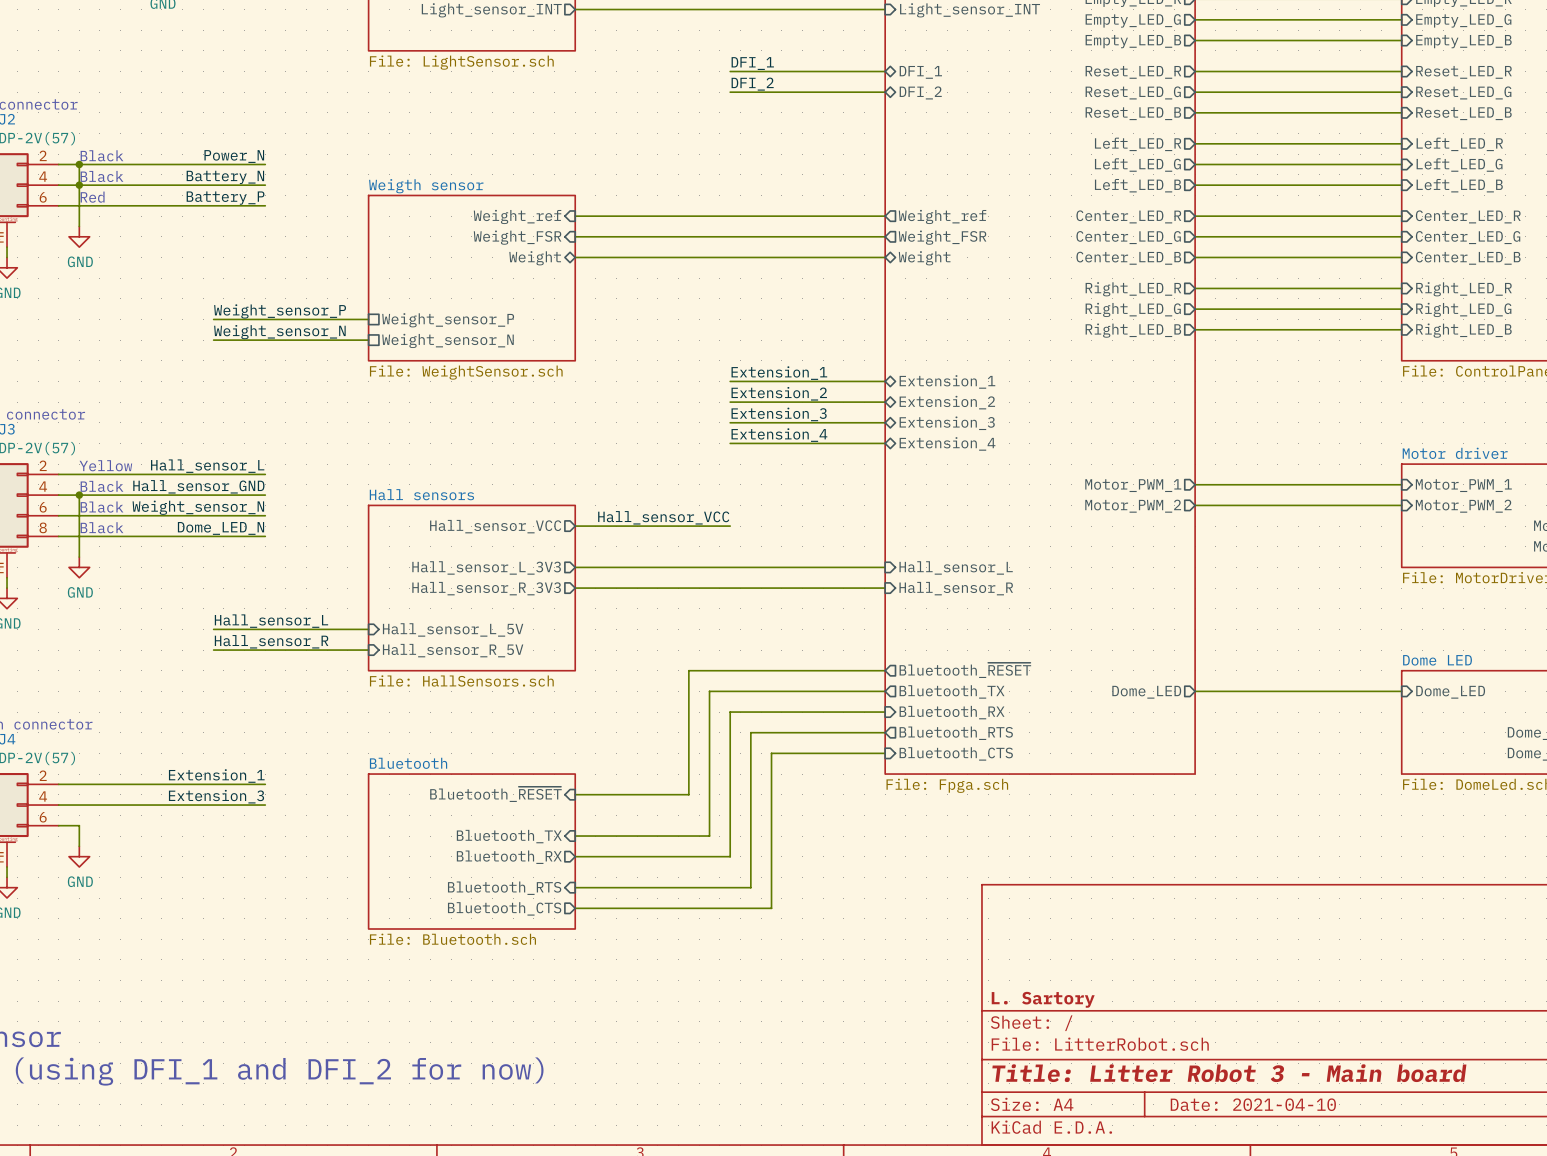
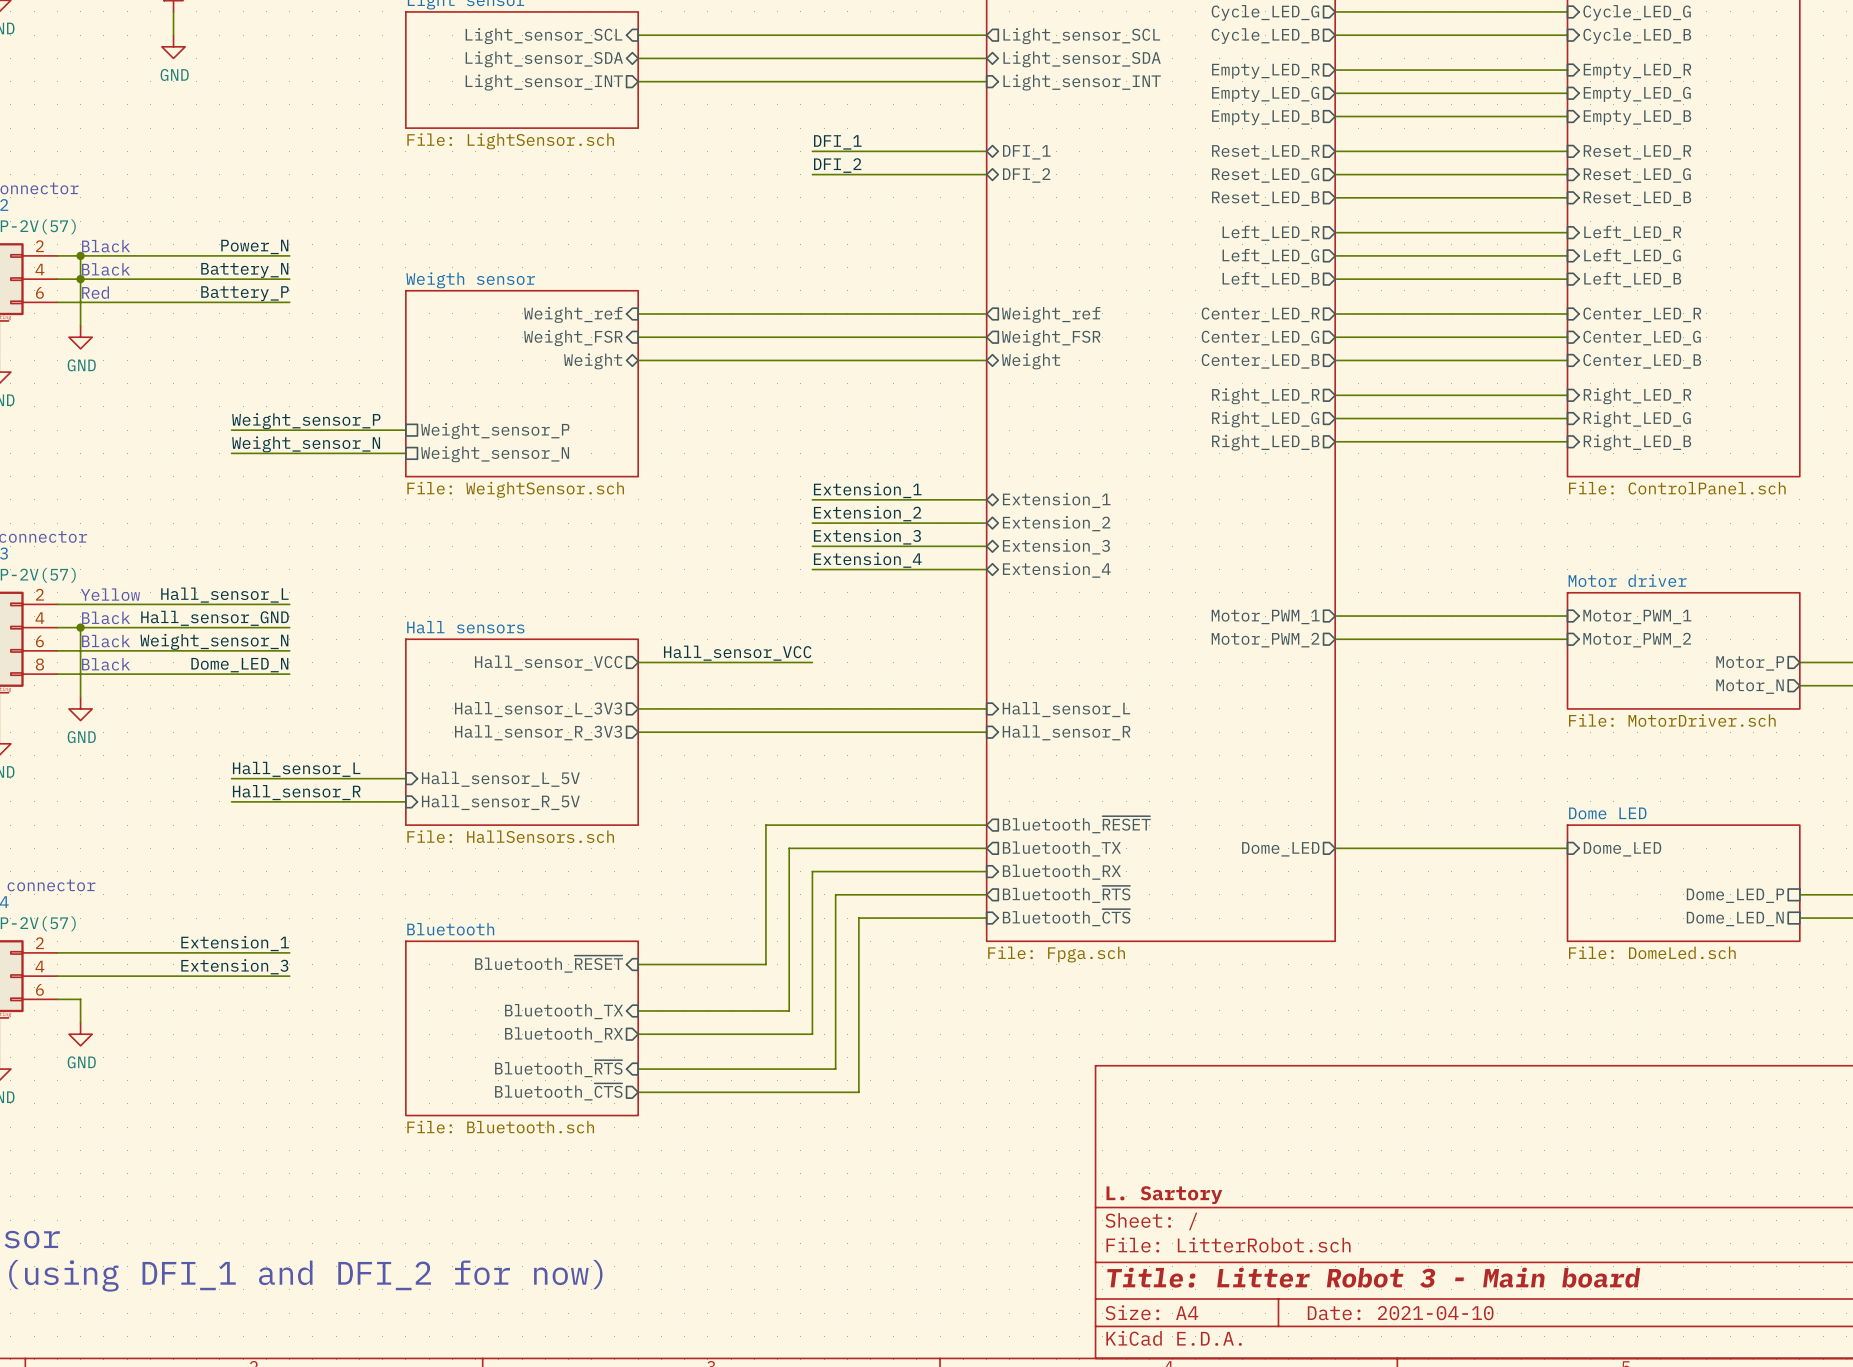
sheet pin: Bluetooth_RTS (956, 733) -> Bluetooth_~{RTS} (1066, 894)
sheet pin: Bluetooth_CTS (956, 753) -> Bluetooth_~{CTS} (1066, 917)
sheet pin: Bluetooth_RTS (504, 888) -> Bluetooth_~{RTS} (558, 1068)
sheet pin: Bluetooth_CTS (504, 908) -> Bluetooth_~{CTS} (558, 1091)

